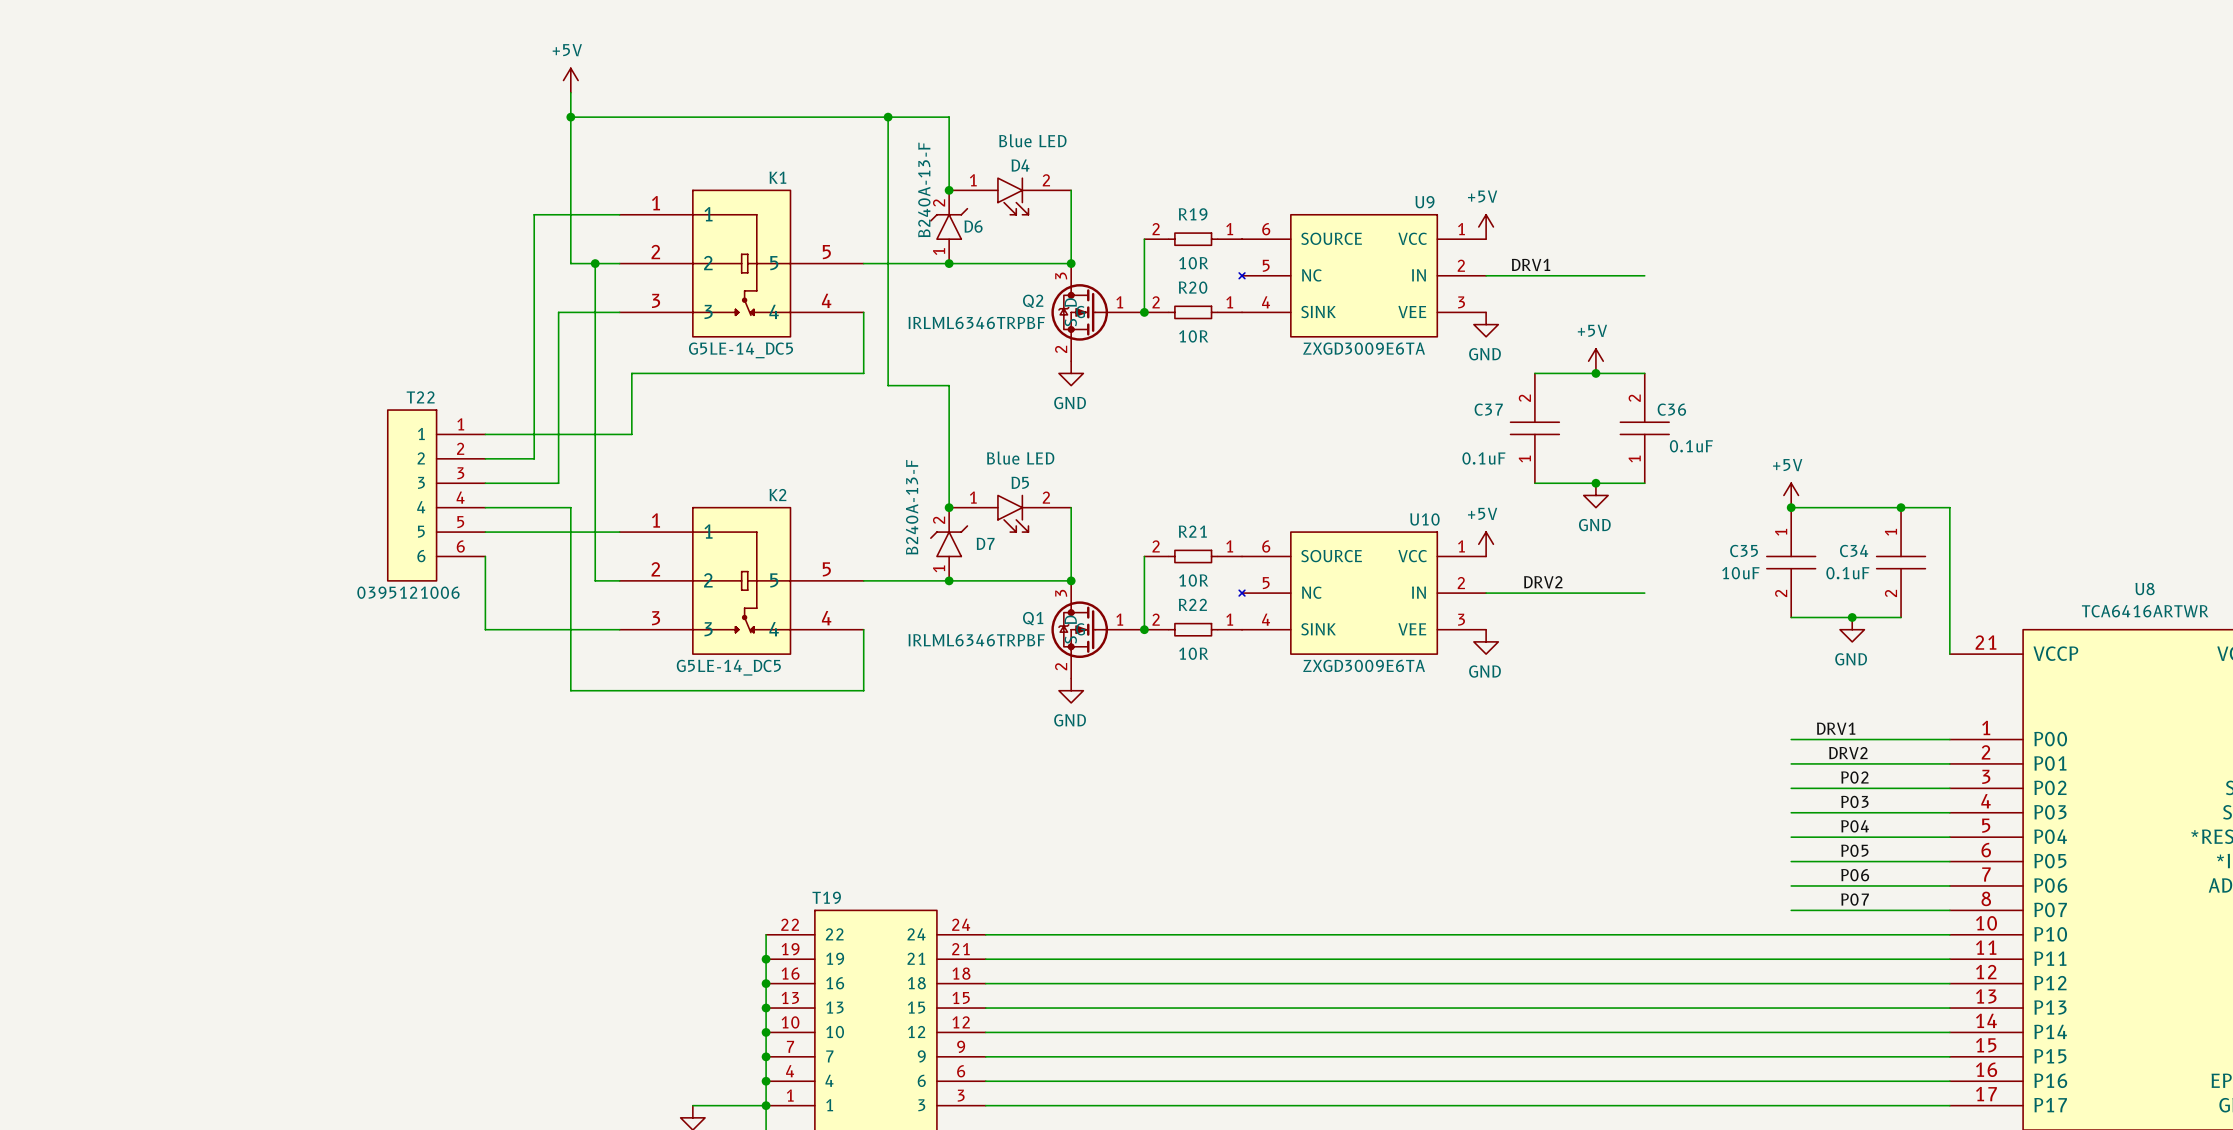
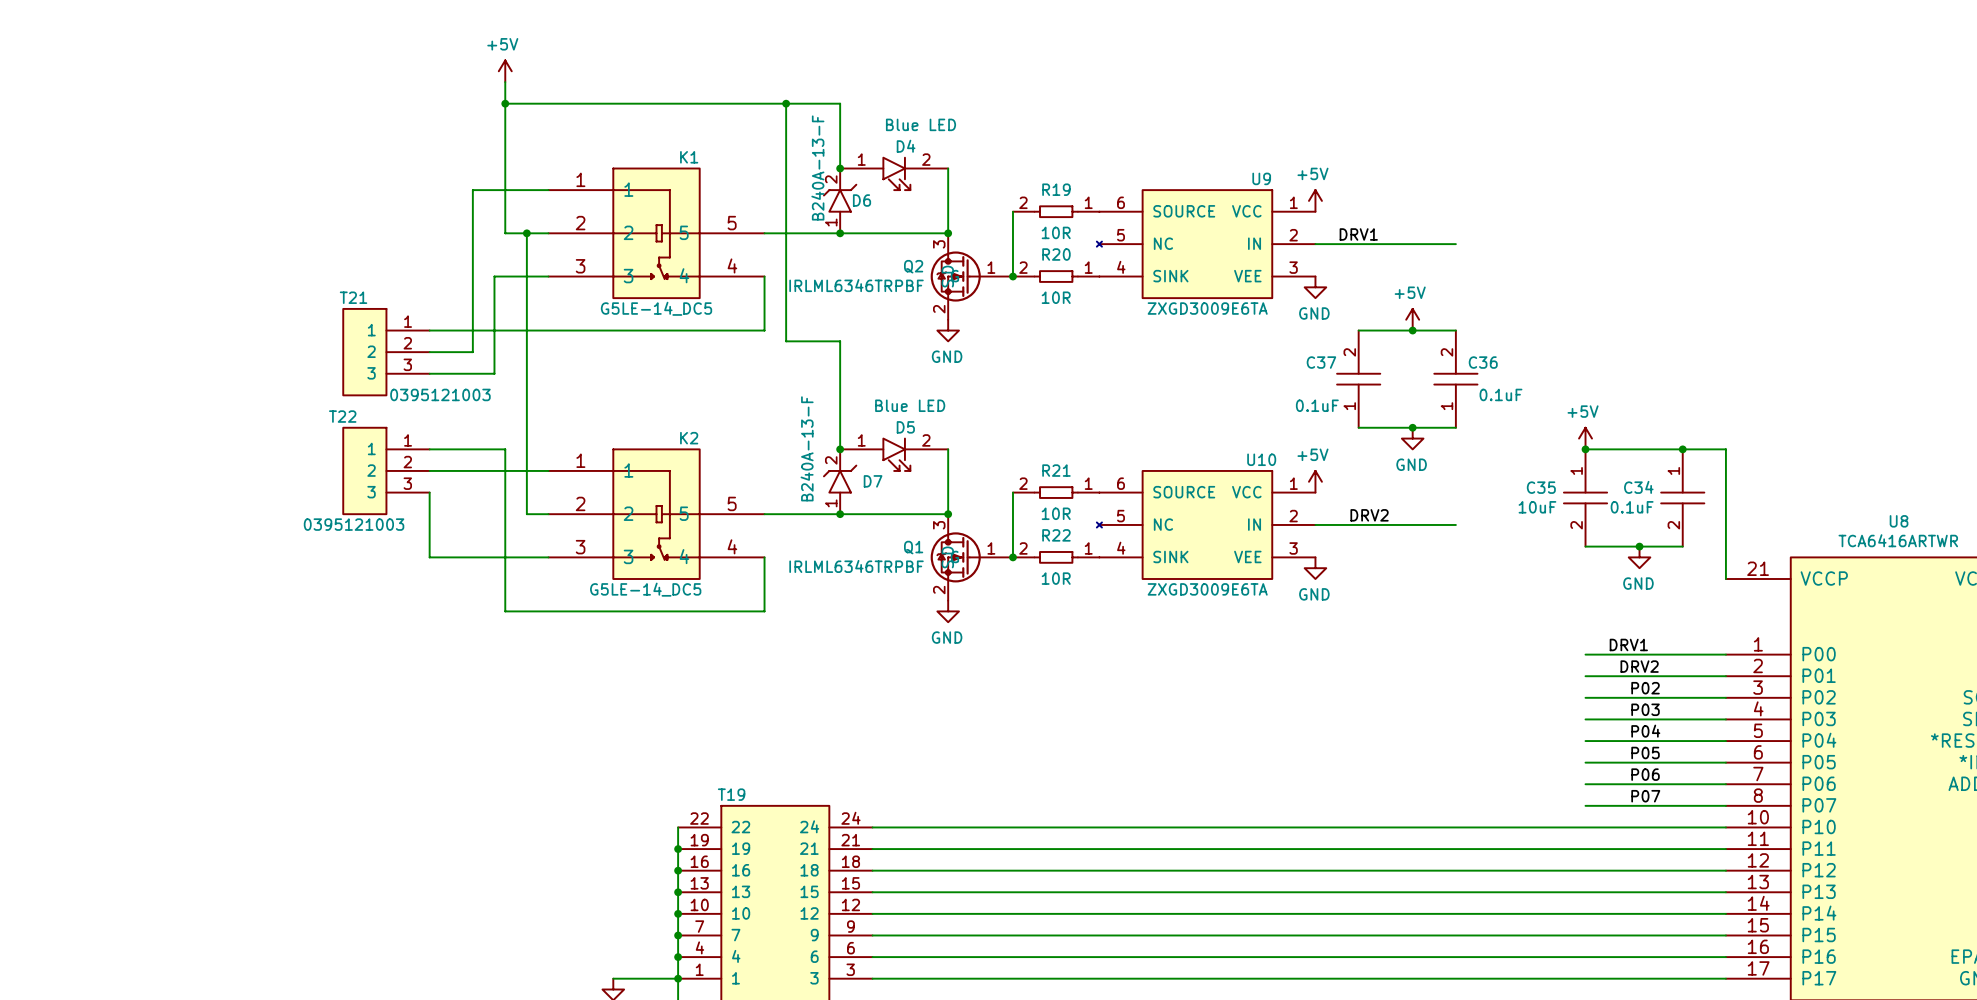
wire: (631, 373) (631, 434) (485, 434) -> (559, 330) (429, 330)
T22 name position: T22 (420, 397) -> T22 (342, 416)
T21: none -> 0395121003 (386, 352)
wire: (534, 397) (534, 458) (485, 458) -> (472, 352) (429, 352)
T22 symbol: [387, 410, 486, 581] -> [343, 427, 430, 515]
wire: (558, 422) (558, 483) (485, 483) -> (494, 373) (429, 373)
T22 value: 0395121006 (408, 592) -> 0395121003 (354, 524)

